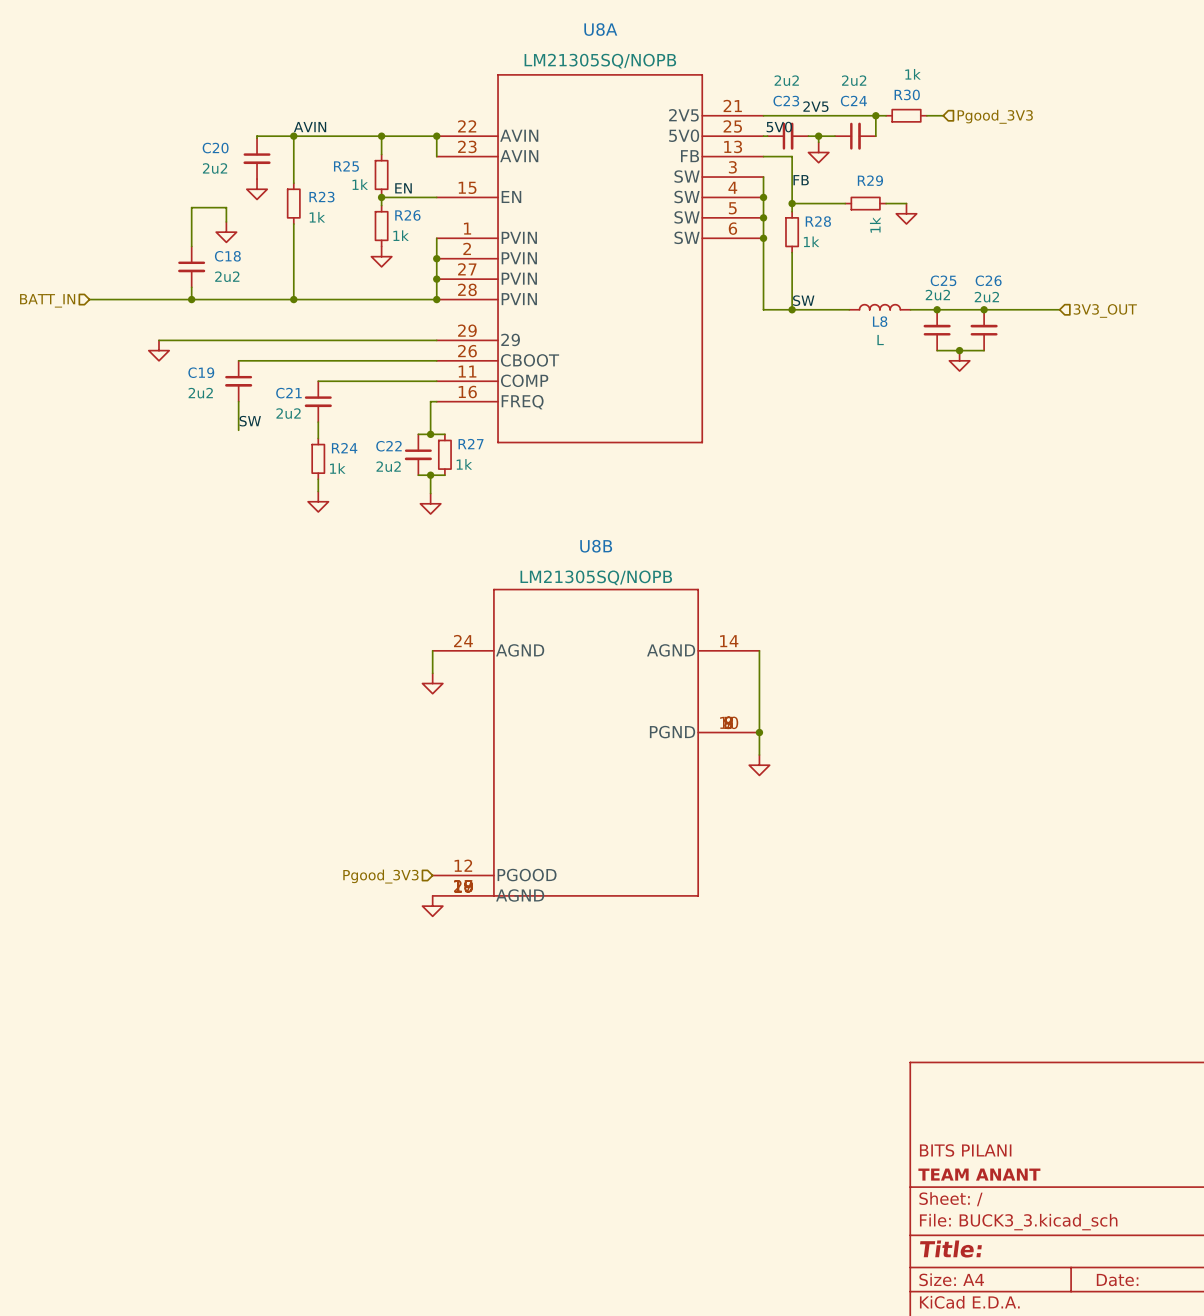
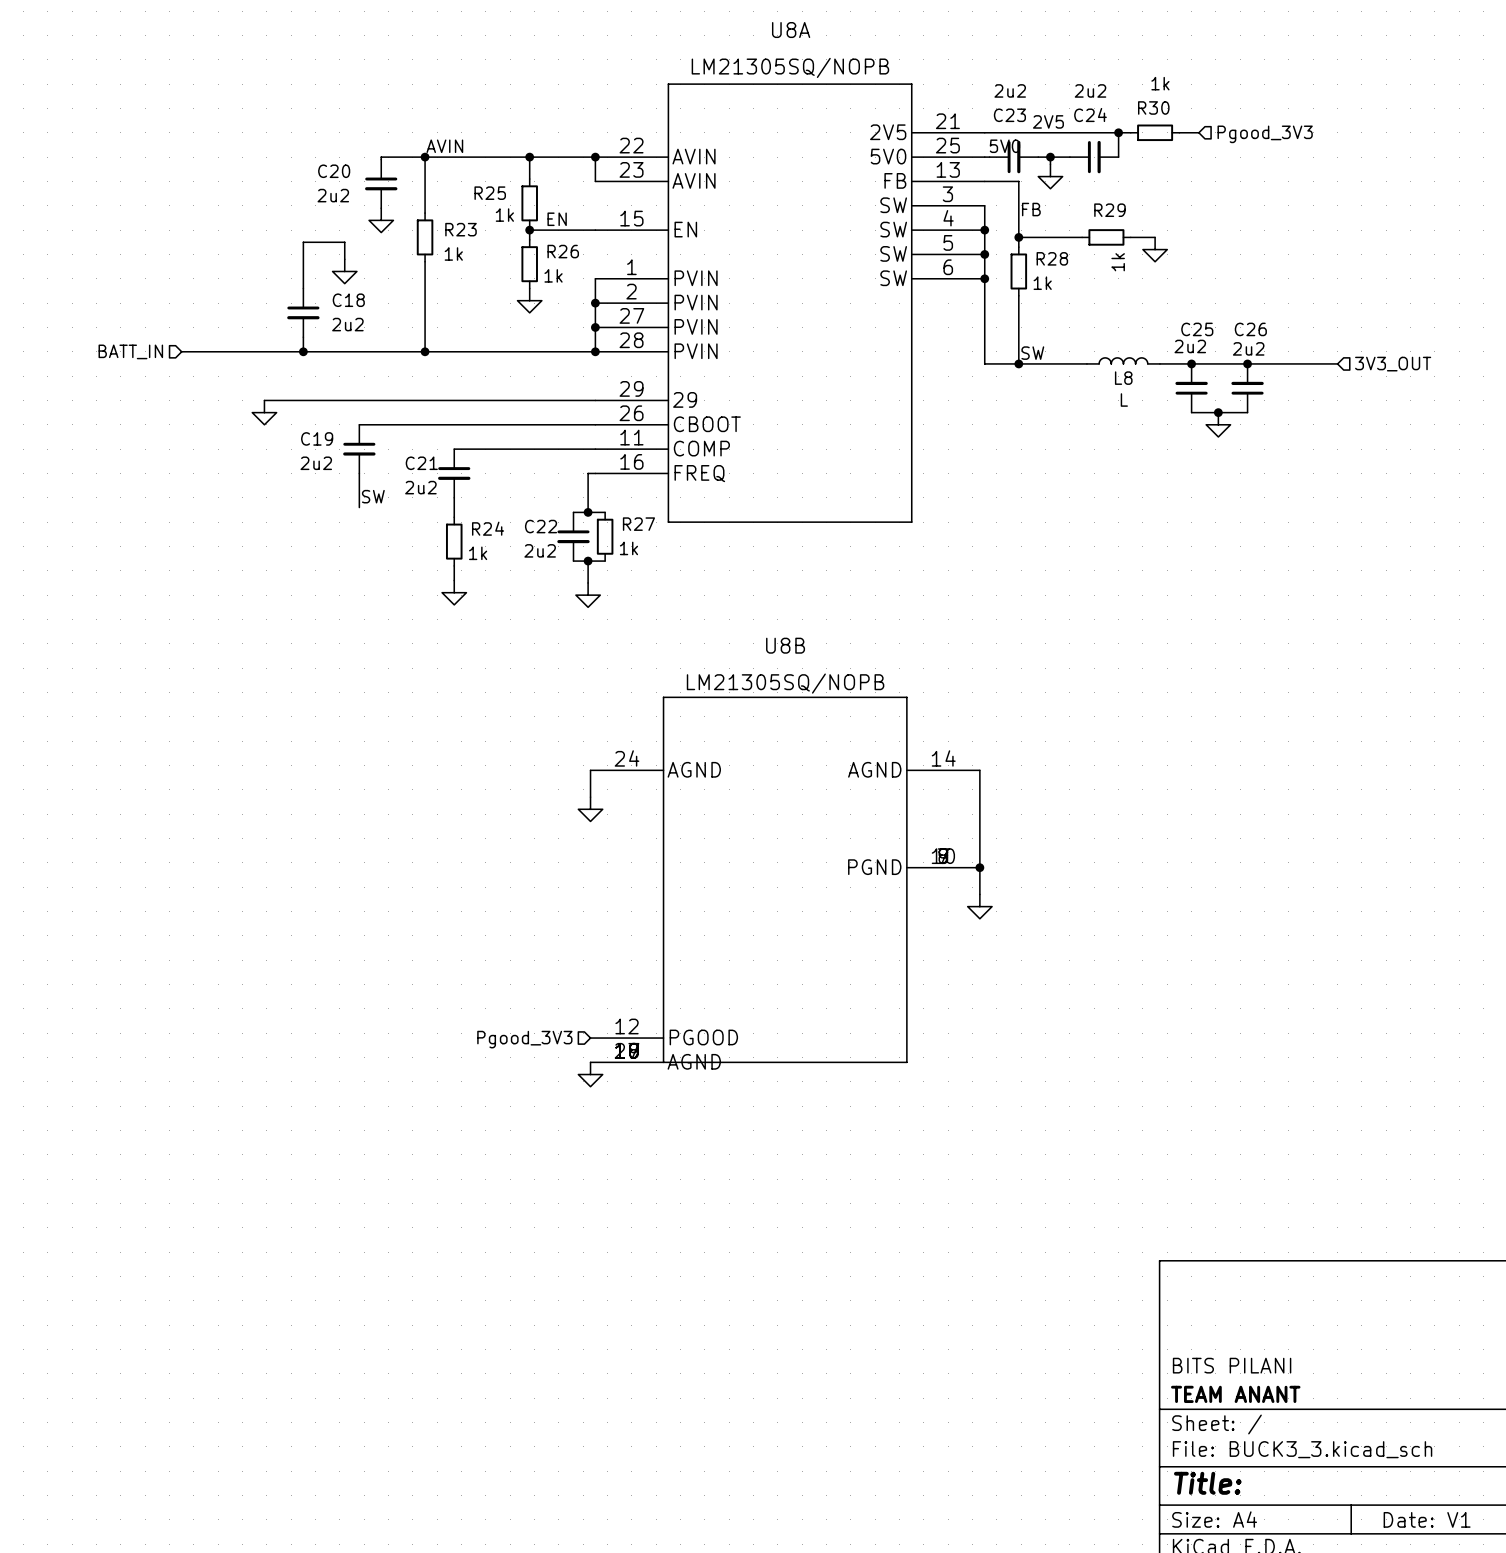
title block: Date: (1117, 1280) -> Date: V1 (1427, 1519)

